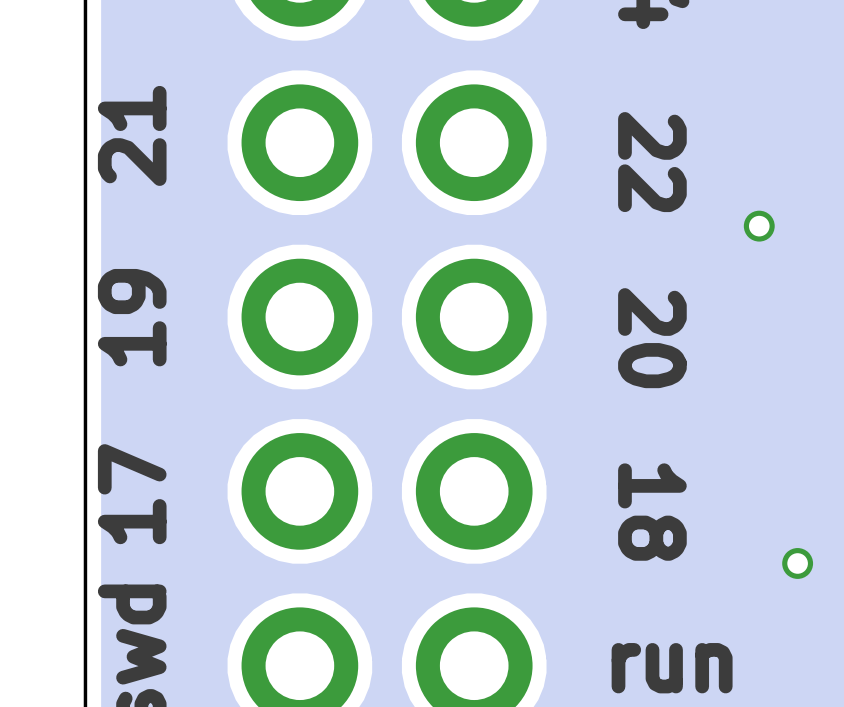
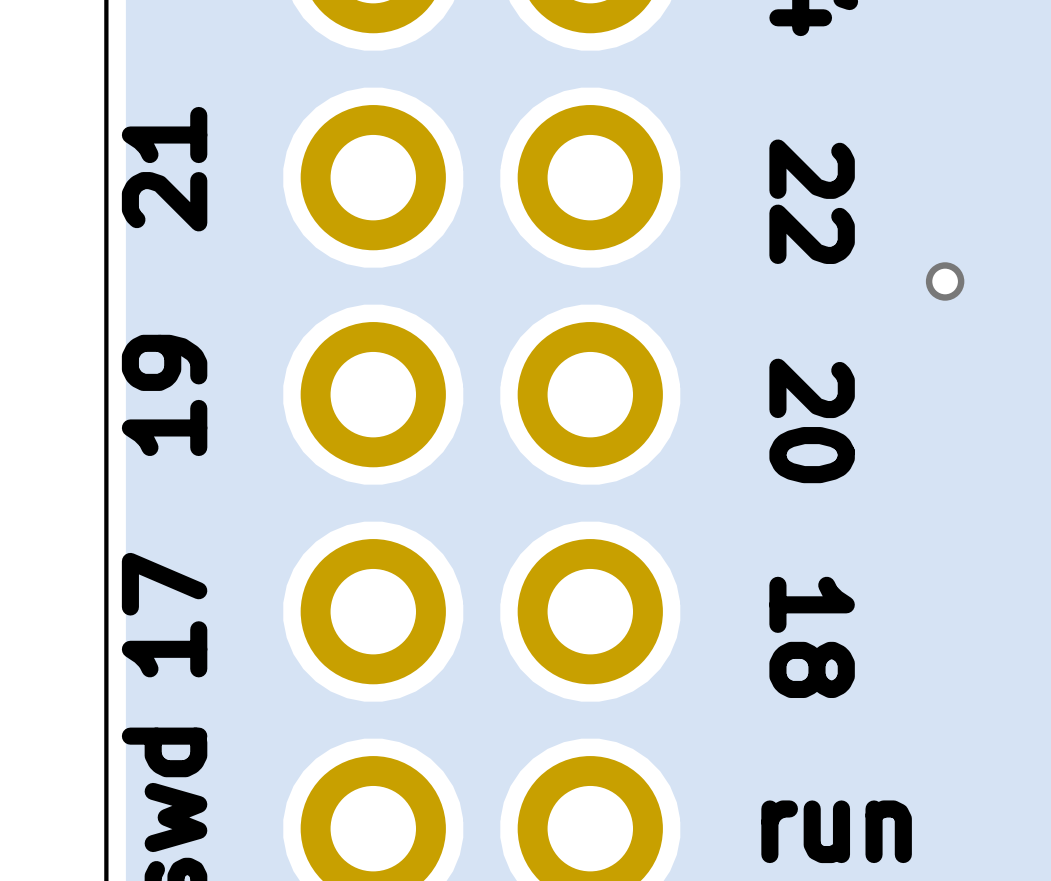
via: (797, 563) -> none

